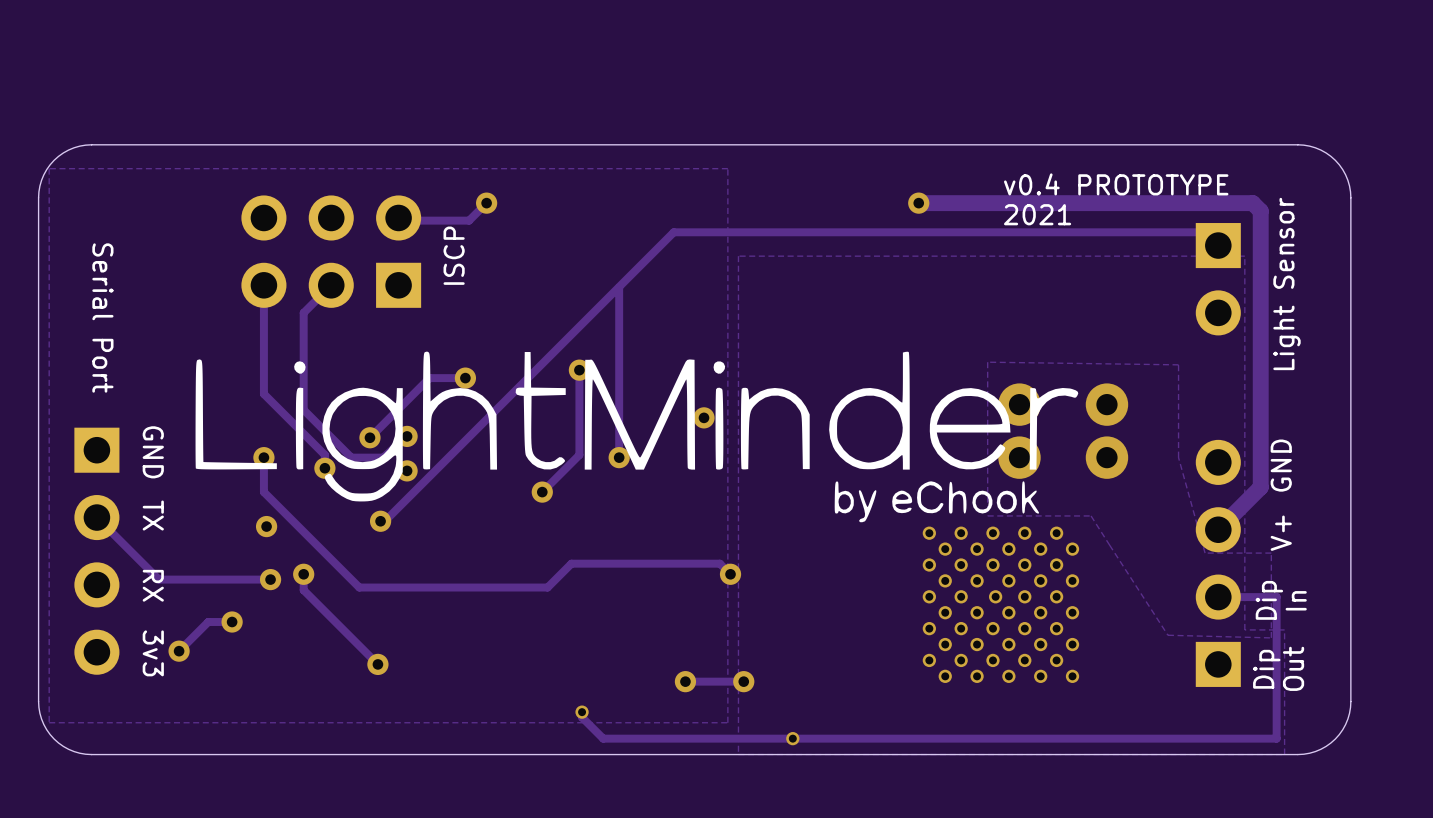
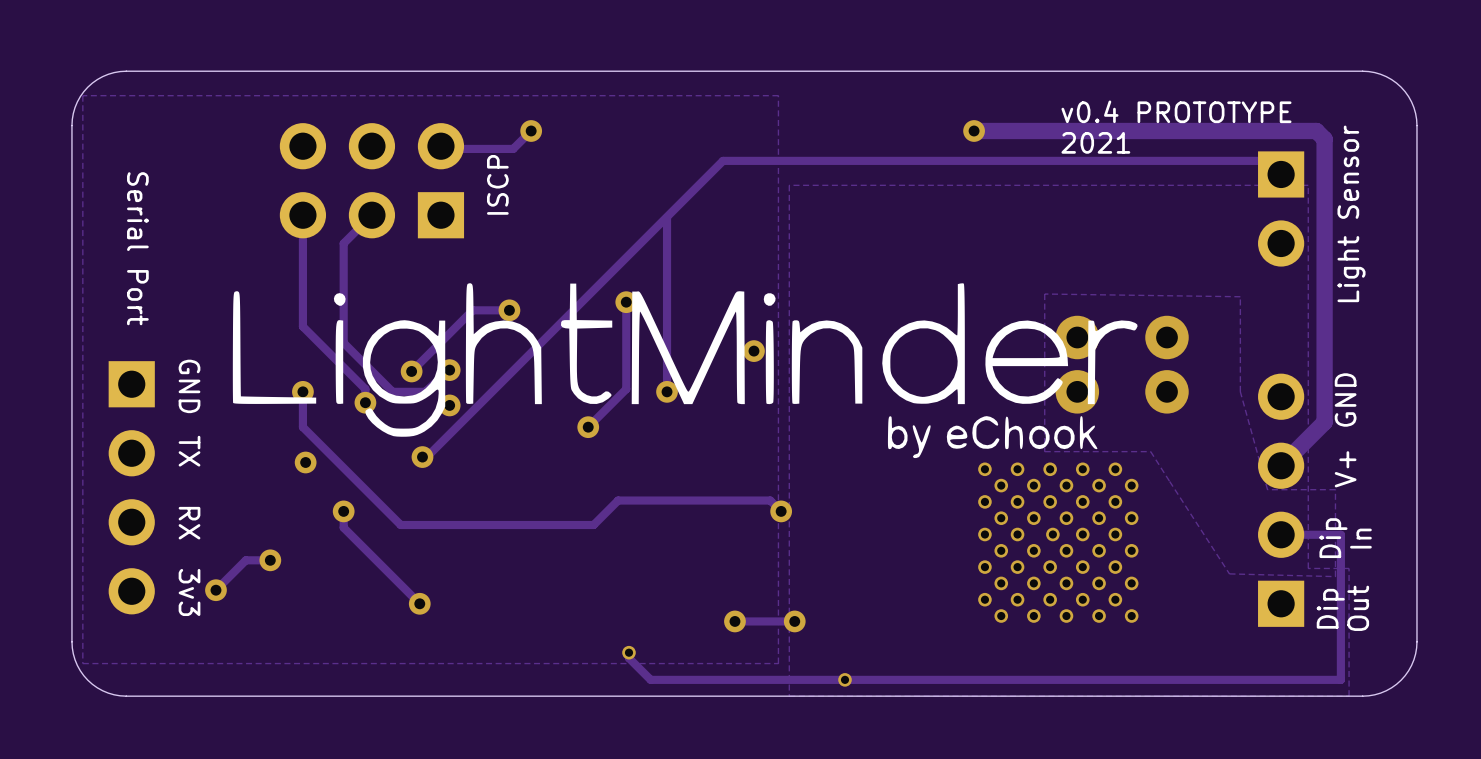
track: (96, 517) (158, 579) (270, 579) -> none
via: (270, 579) -> none

